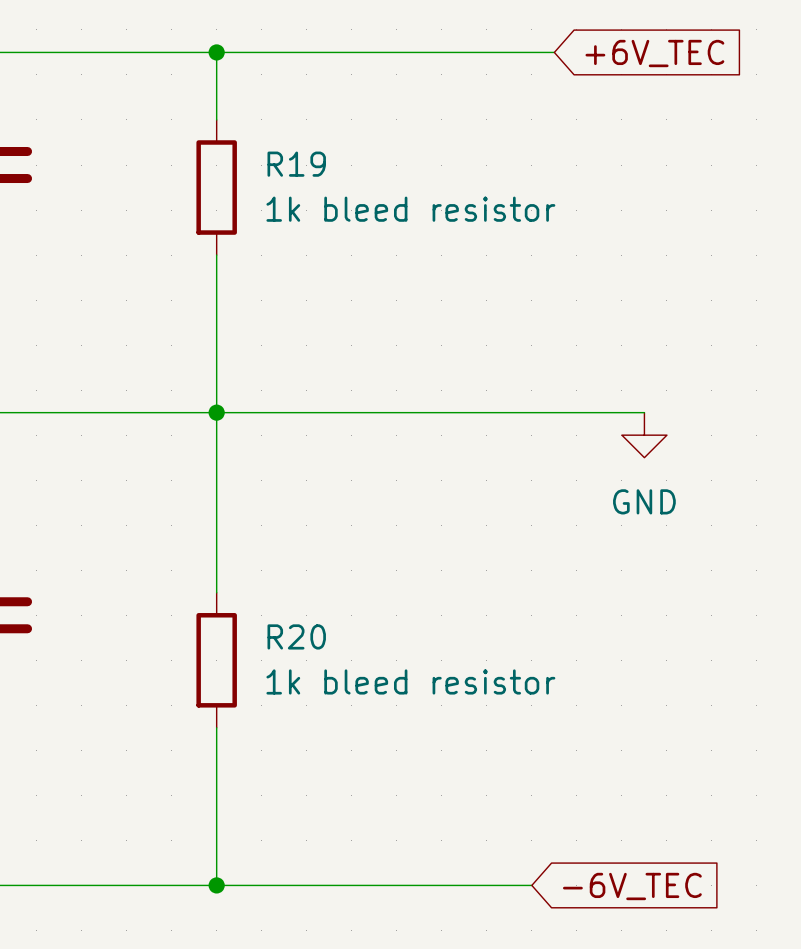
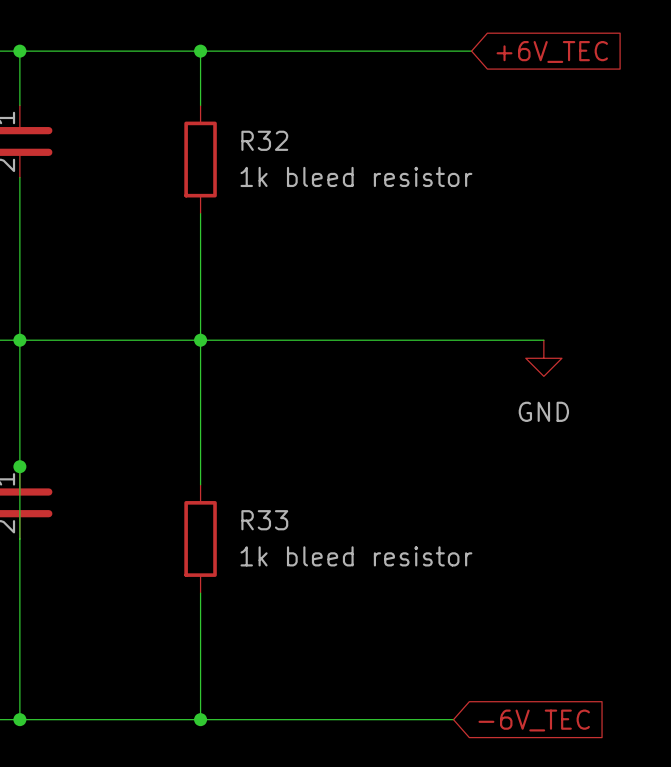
R19 name: R19 (296, 164) -> R32 (264, 140)
R20 name: R20 (296, 636) -> R33 (264, 520)

